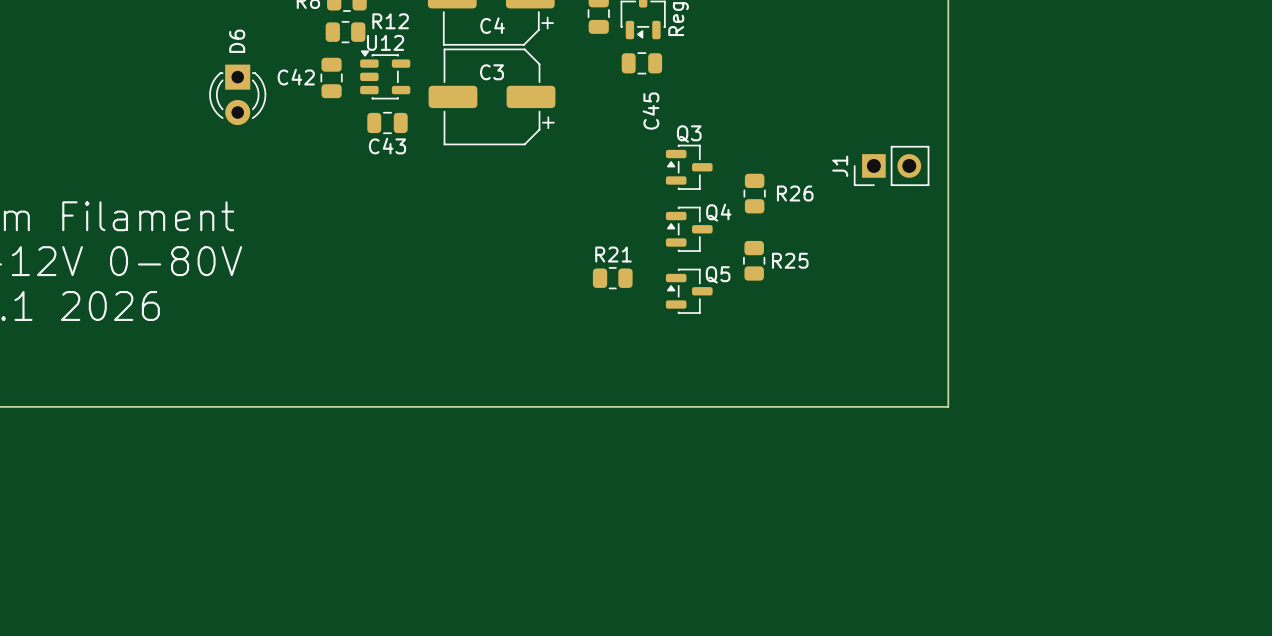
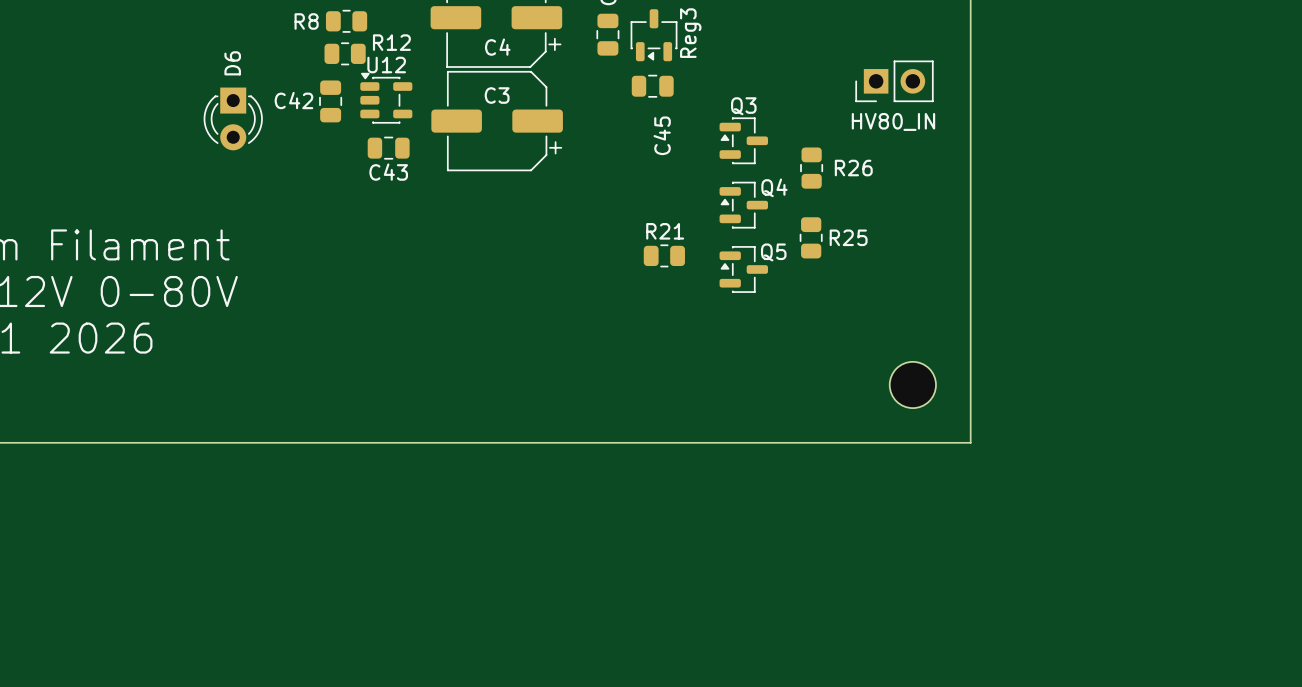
part: none -> HV80_IN (894, 81)
J1: (891, 165) -> none
Q3 position: (689, 167) -> (743, 140)
R26 position: (754, 193) -> (811, 168)
Q4 position: (689, 229) -> (743, 205)
R25 position: (754, 260) -> (811, 237)
R21 position: (612, 278) -> (664, 255)
Q5 position: (689, 291) -> (743, 269)
part: none -> (912, 384)

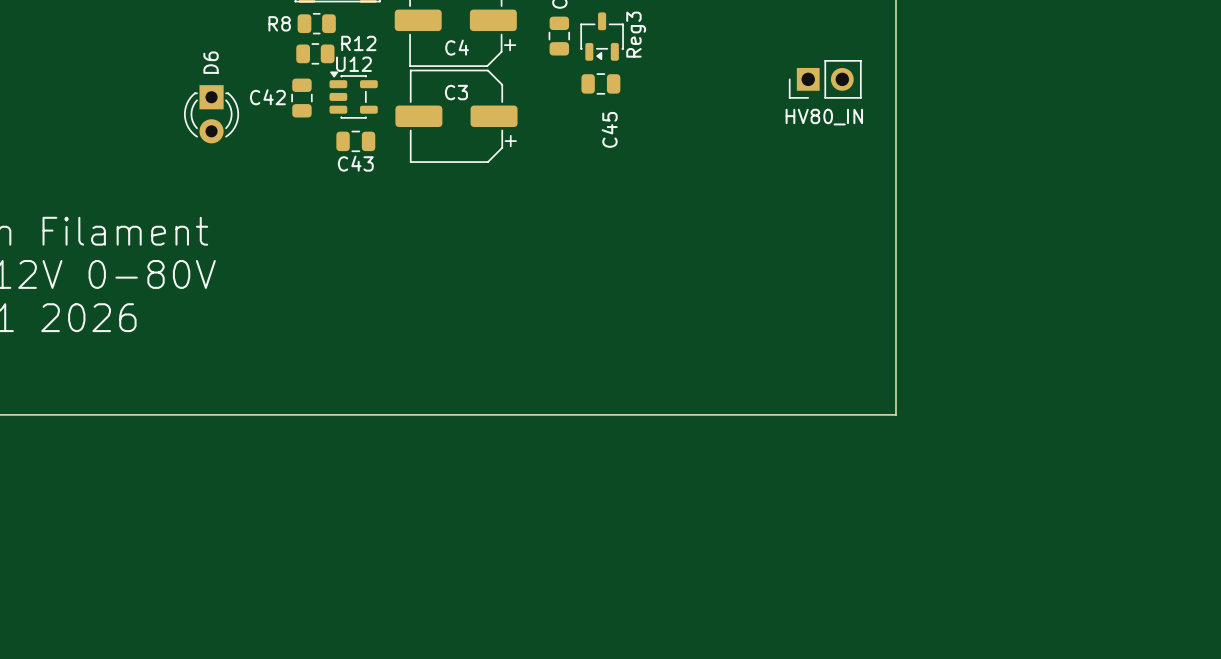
Q3: (743, 140) -> none
R26: (811, 168) -> none
Q4: (743, 205) -> none
R25: (811, 237) -> none
R21: (664, 255) -> none
Q5: (743, 269) -> none
part: (912, 384) -> none

